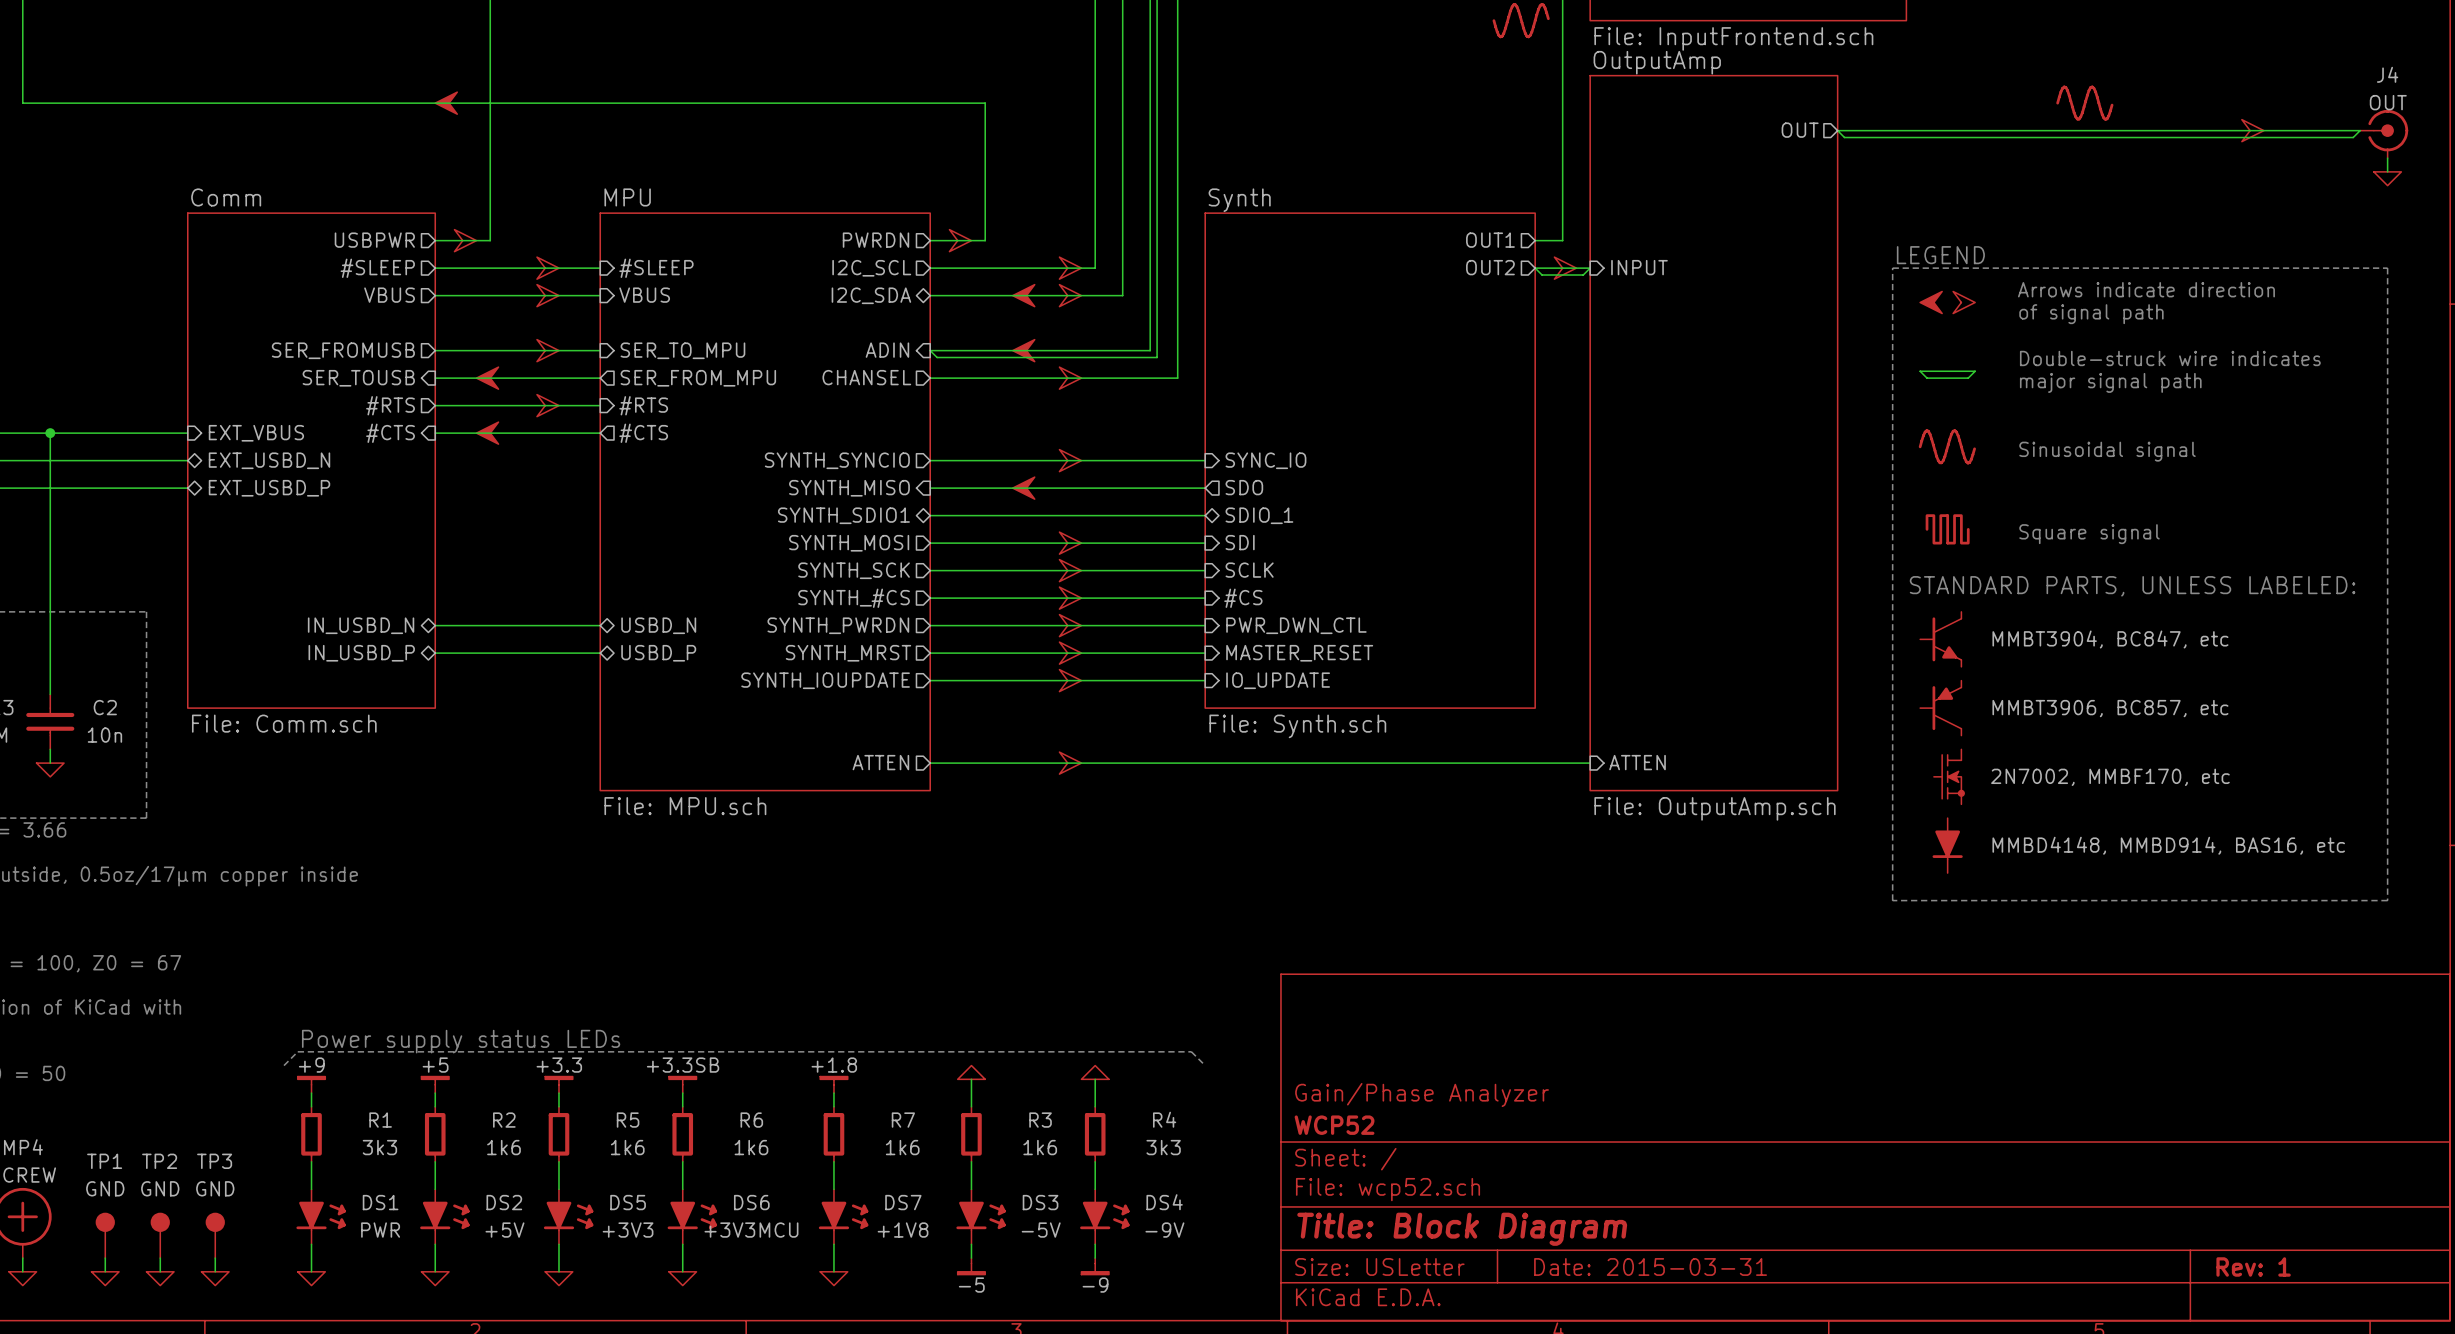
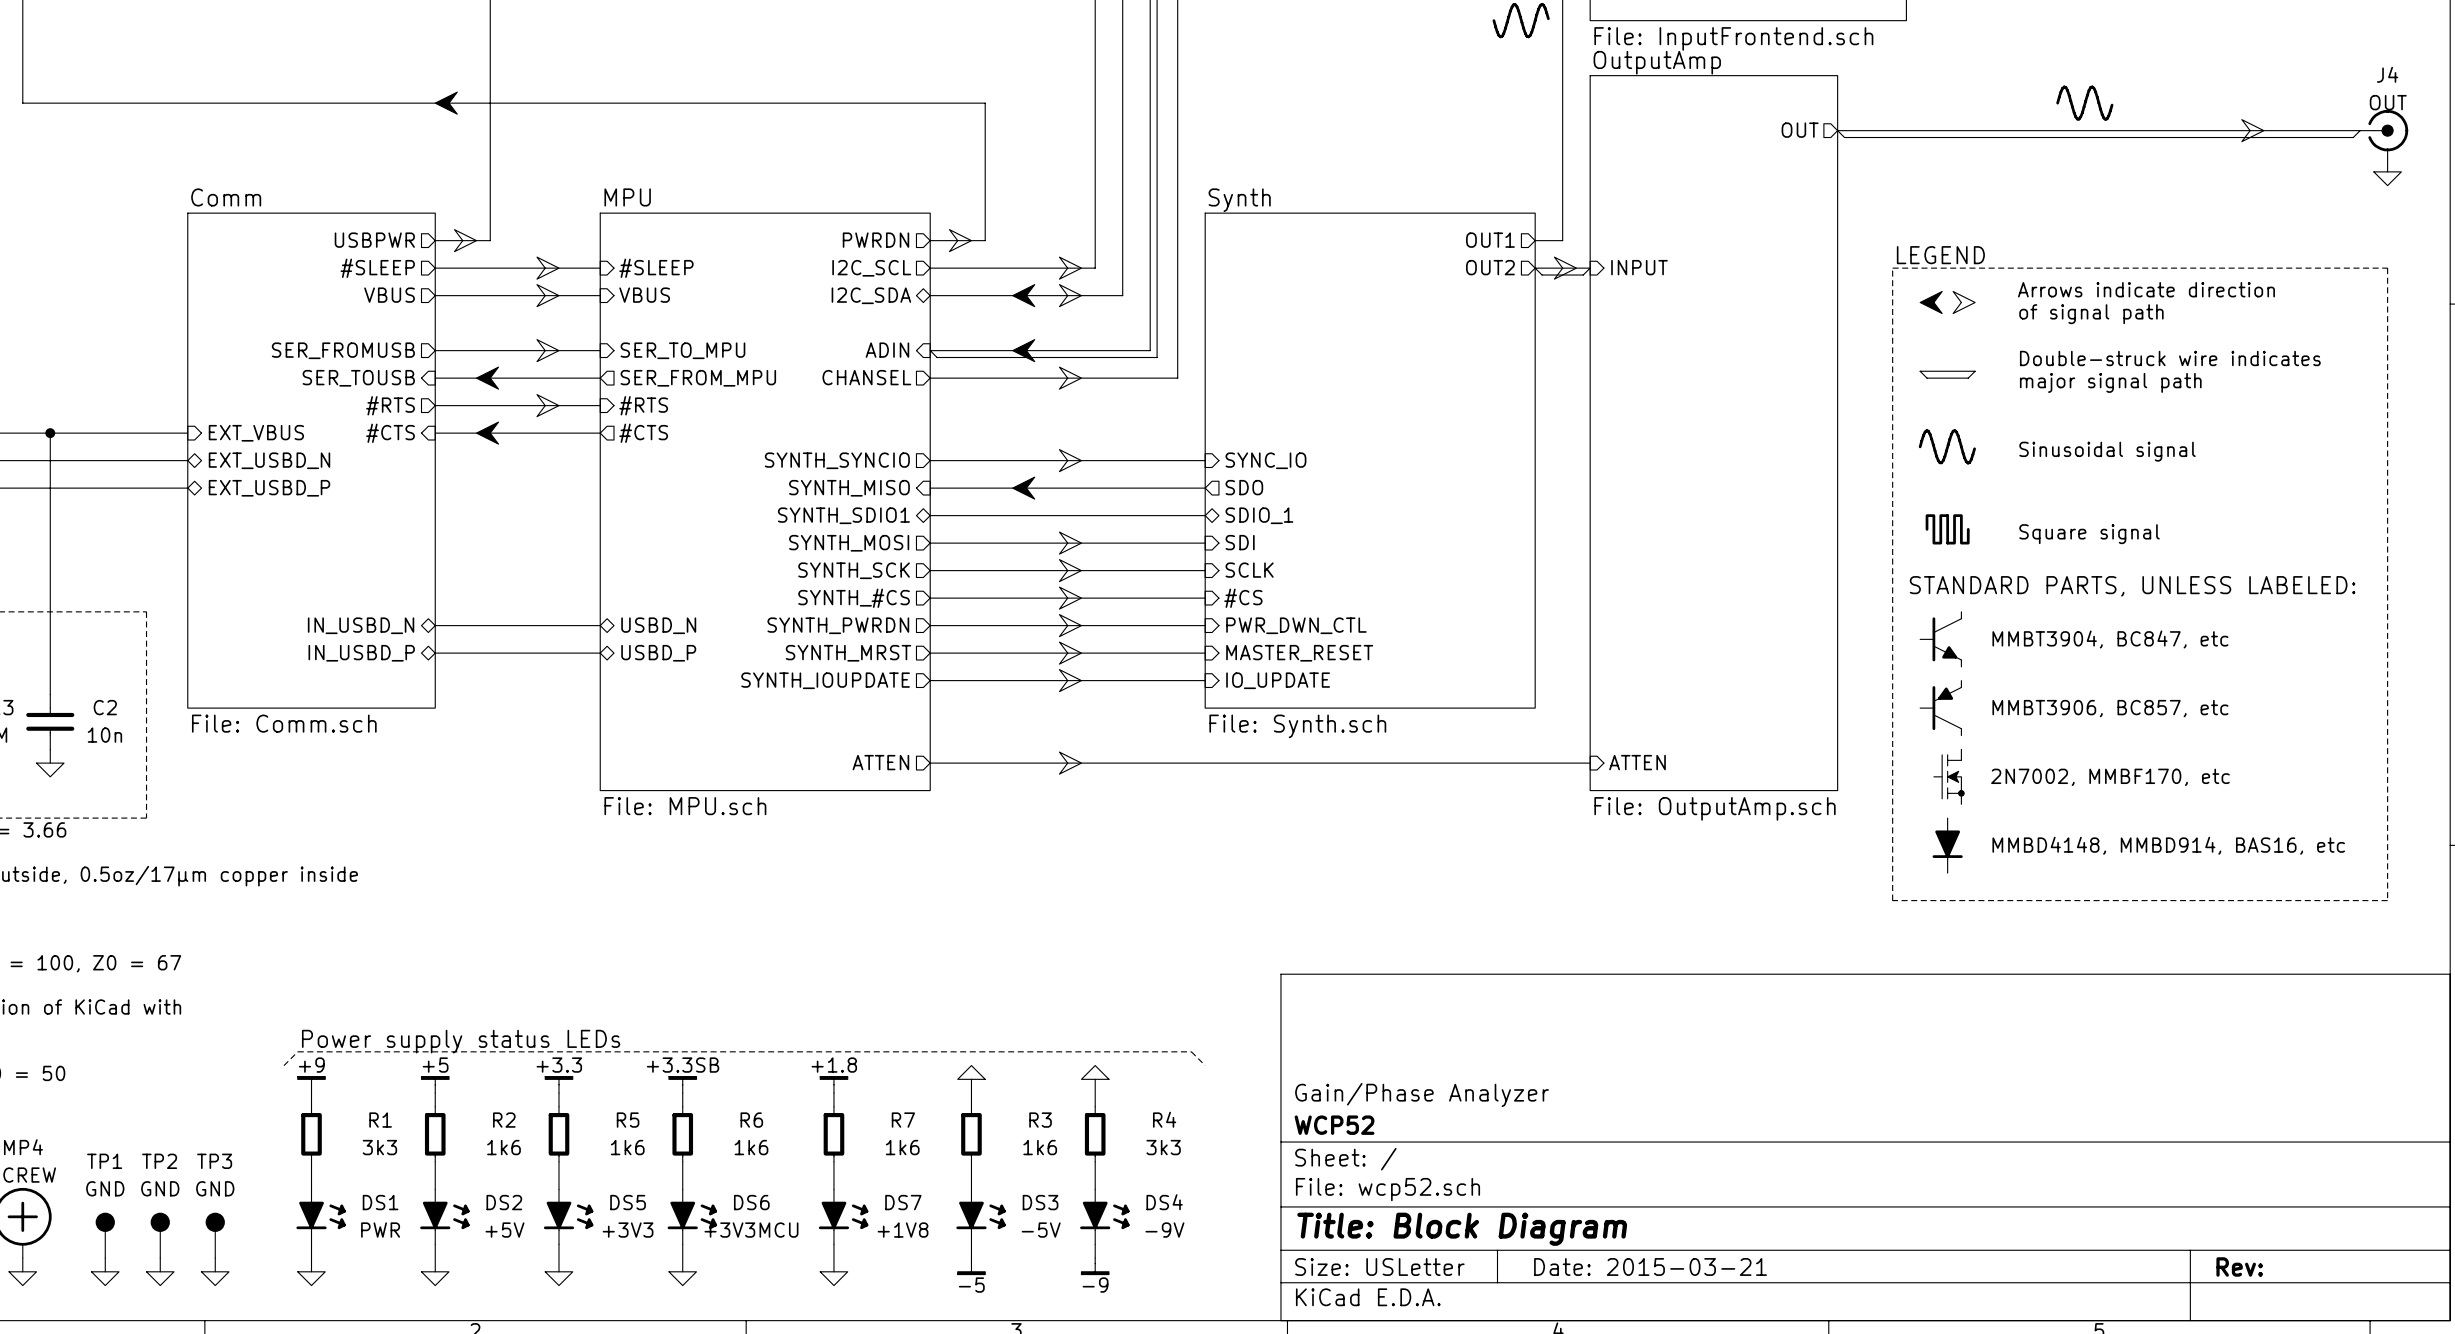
title block: Date: 2015-03-31 (1650, 1266) -> Date: 2015-03-21 (1650, 1266)
title block: Rev: 1 (2253, 1266) -> Rev: (2239, 1266)

